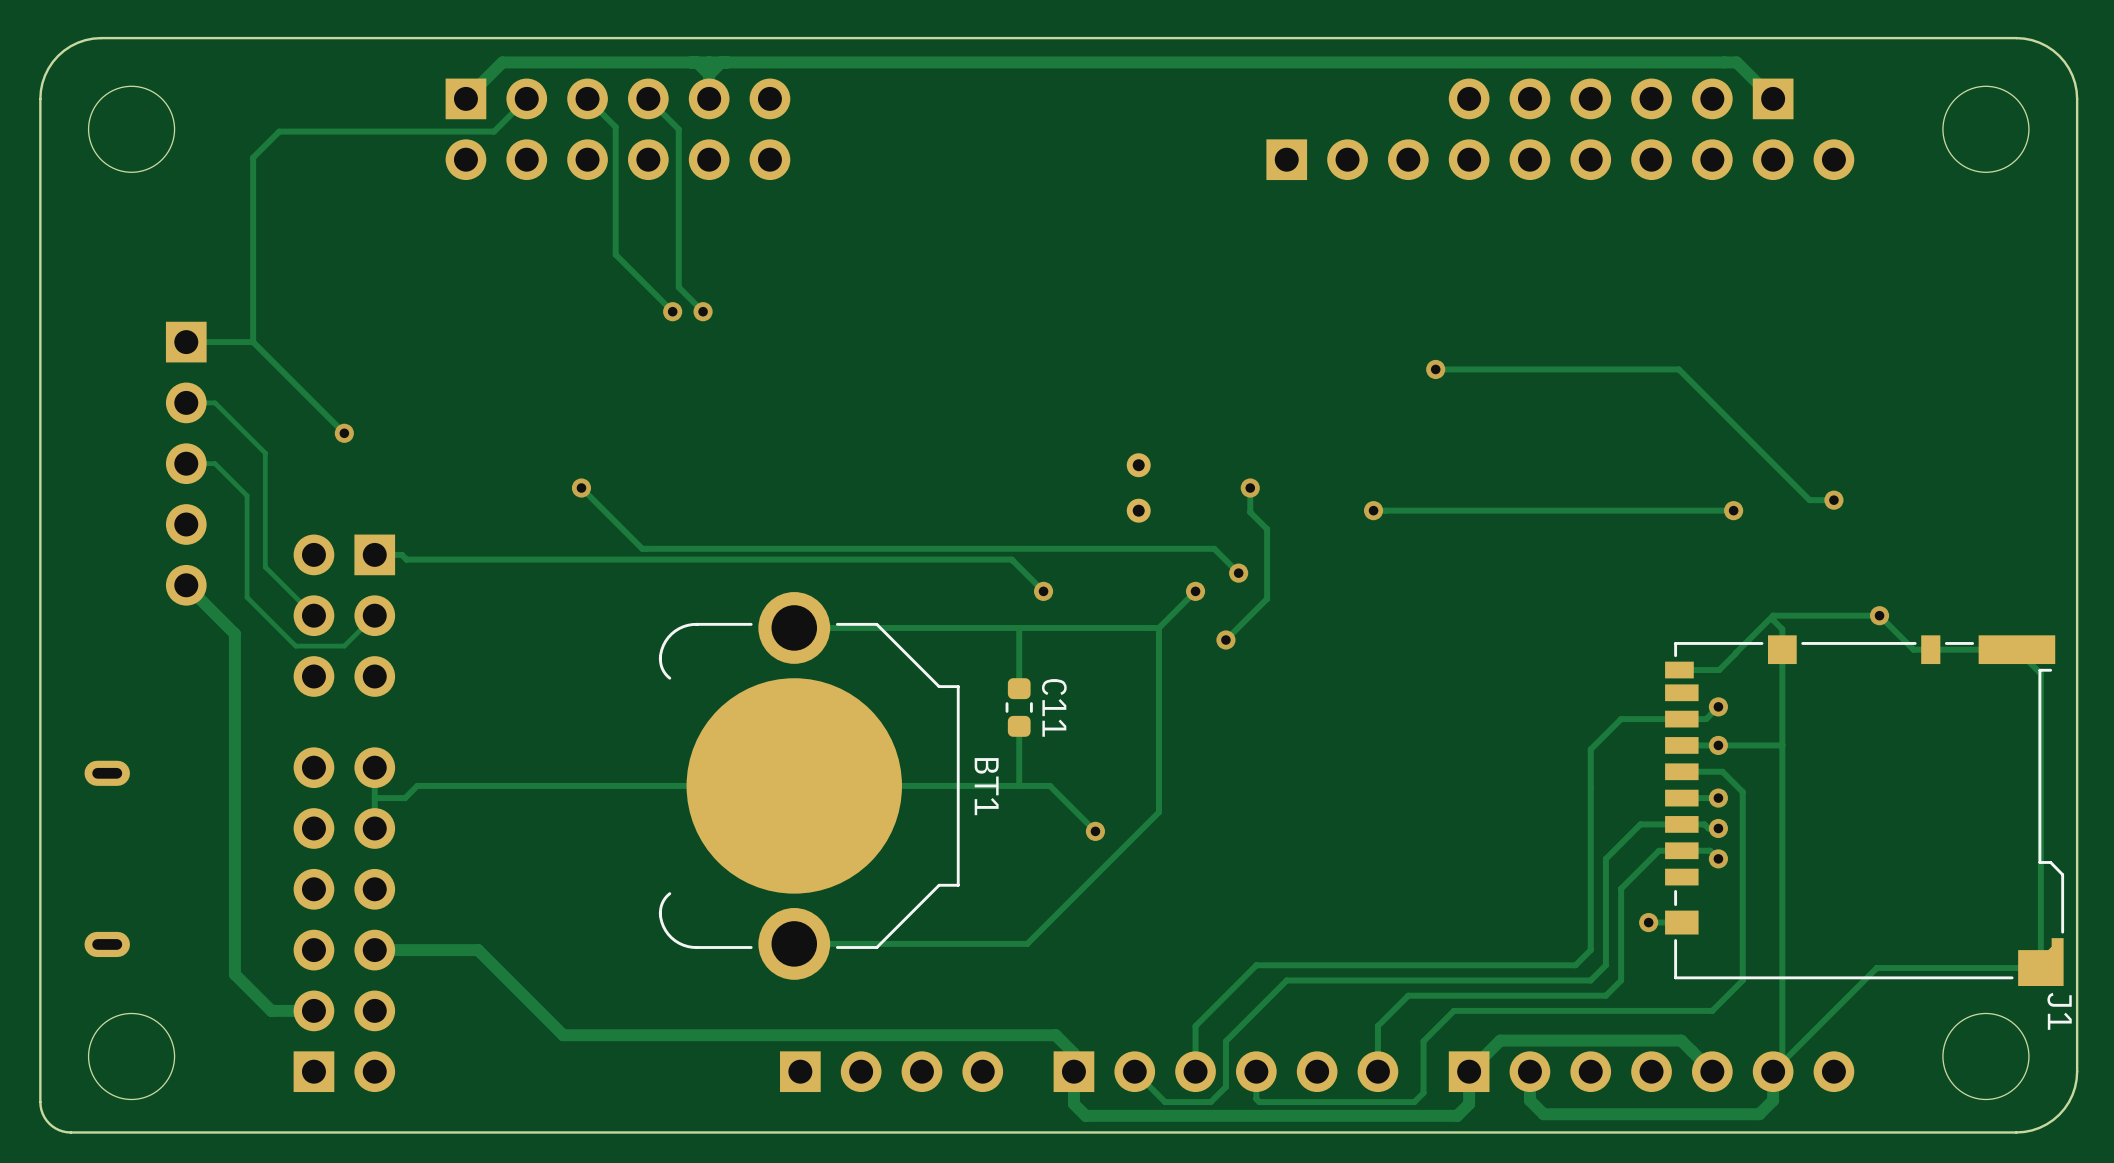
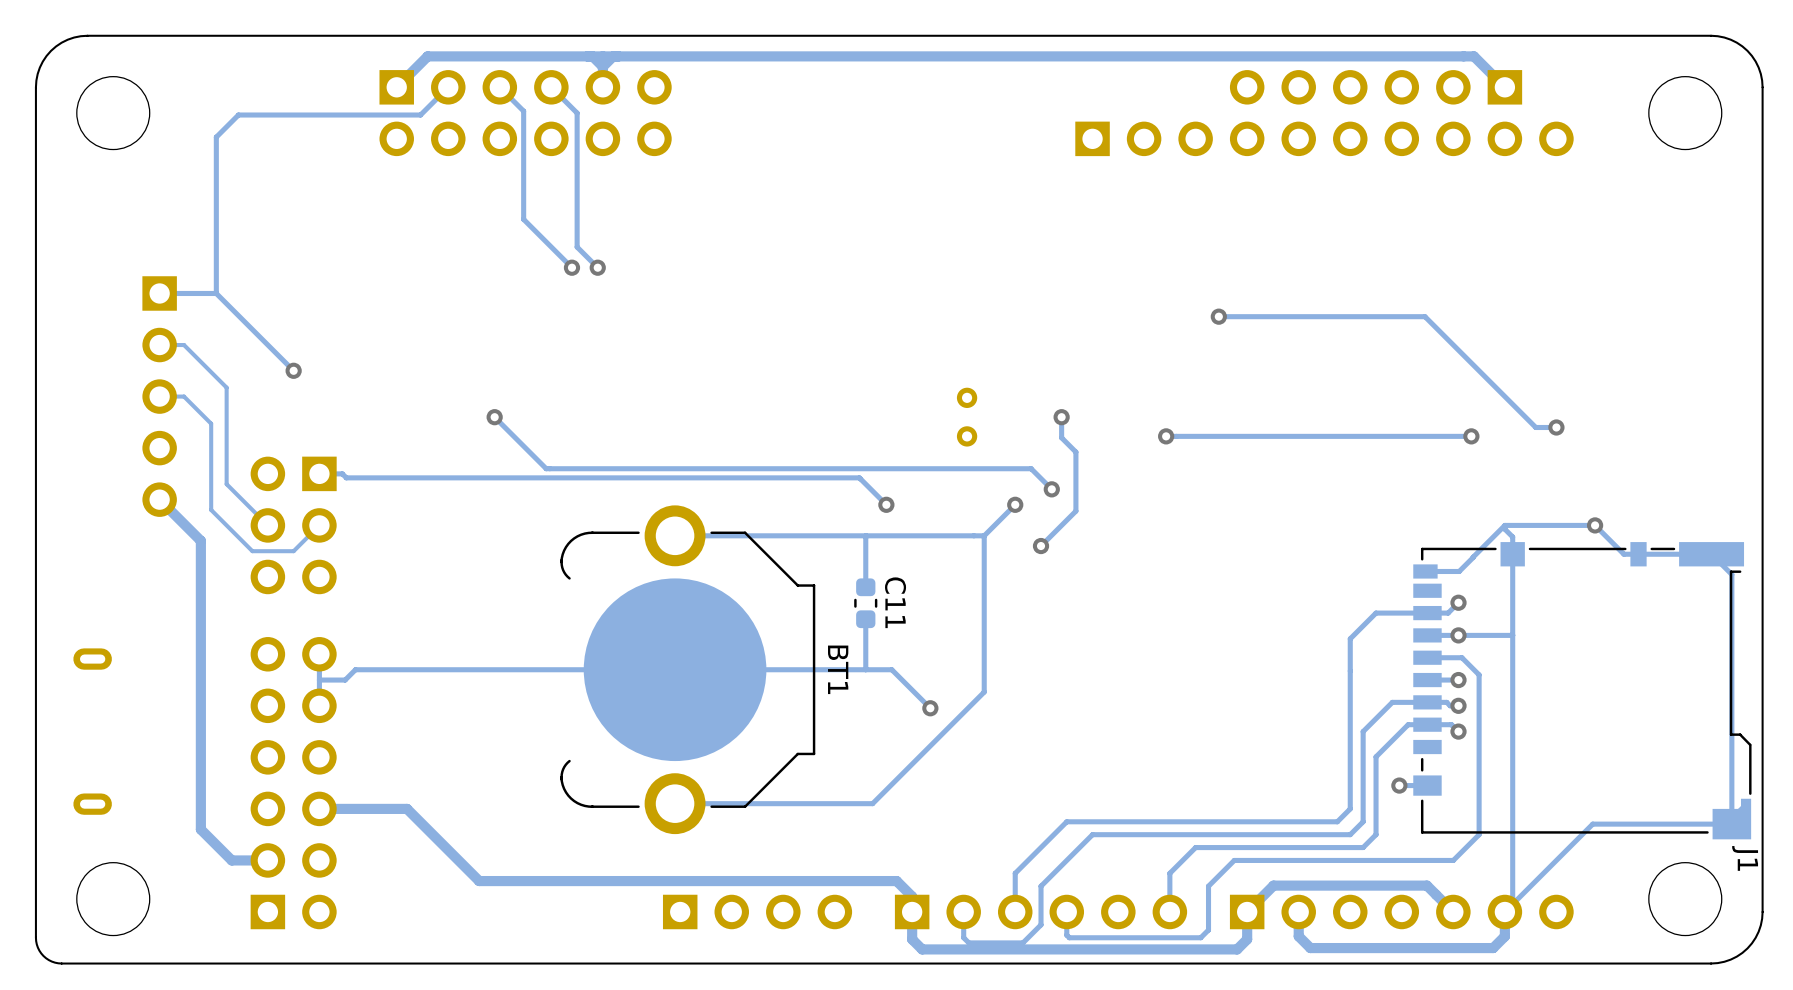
track: (1134, 1071) (1165, 1102) (1210, 1102) -> (963, 922) (963, 937) (968, 942) (1022, 942) (1028, 937)

